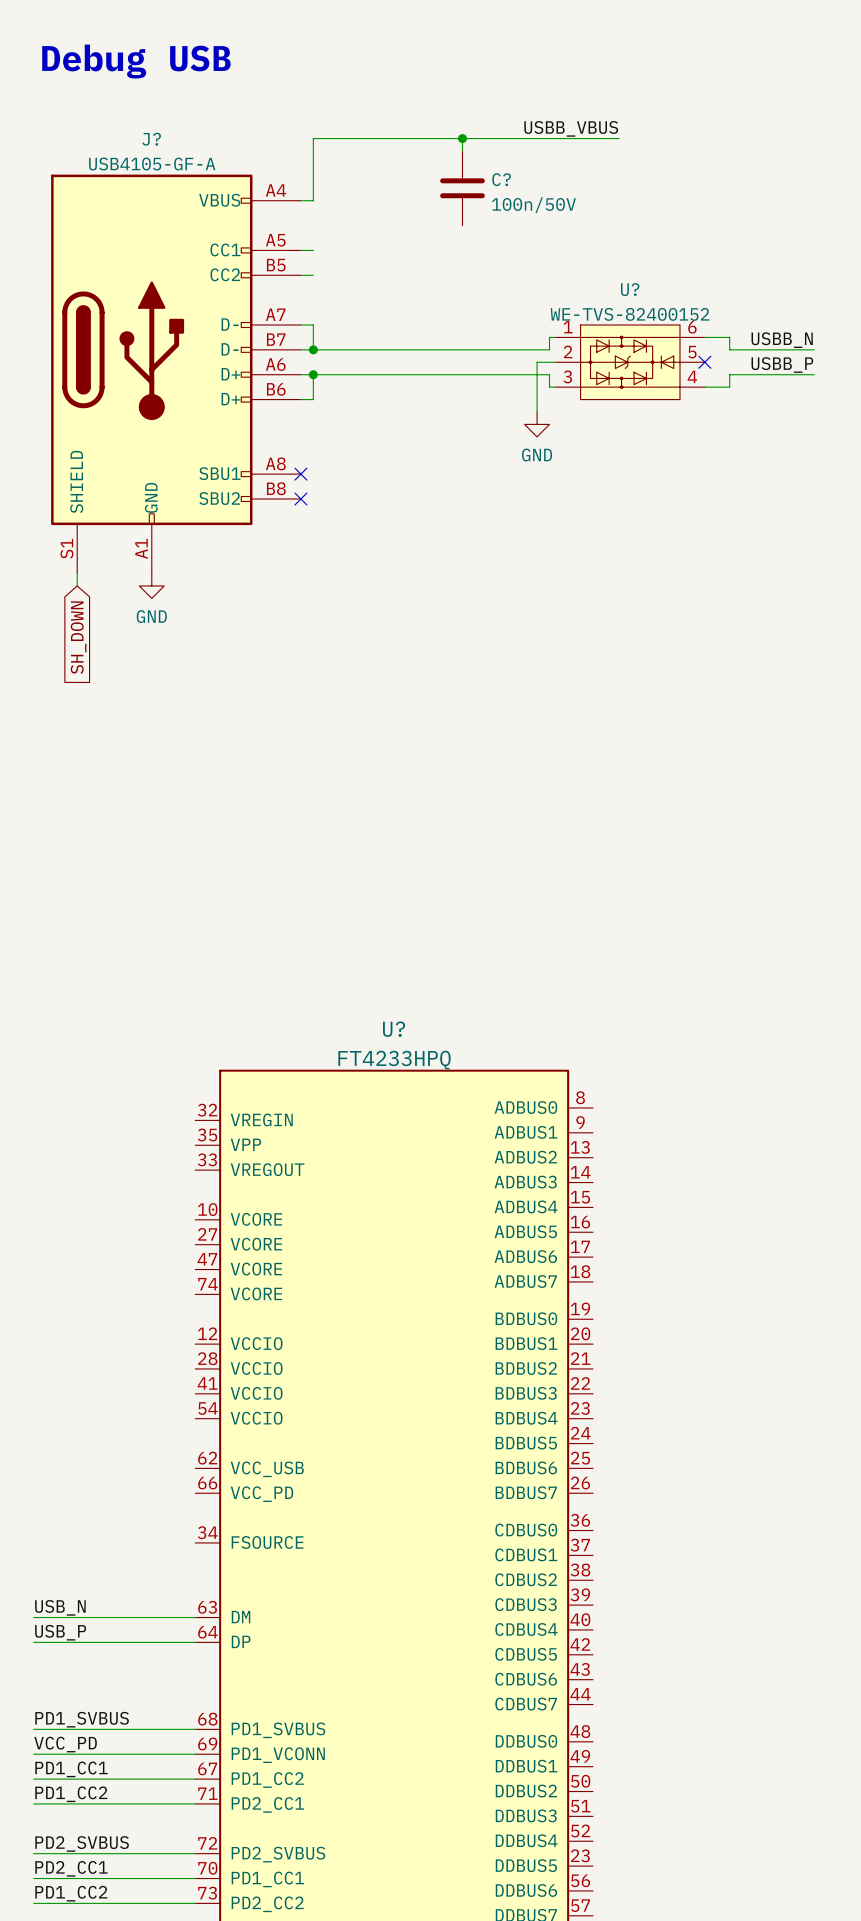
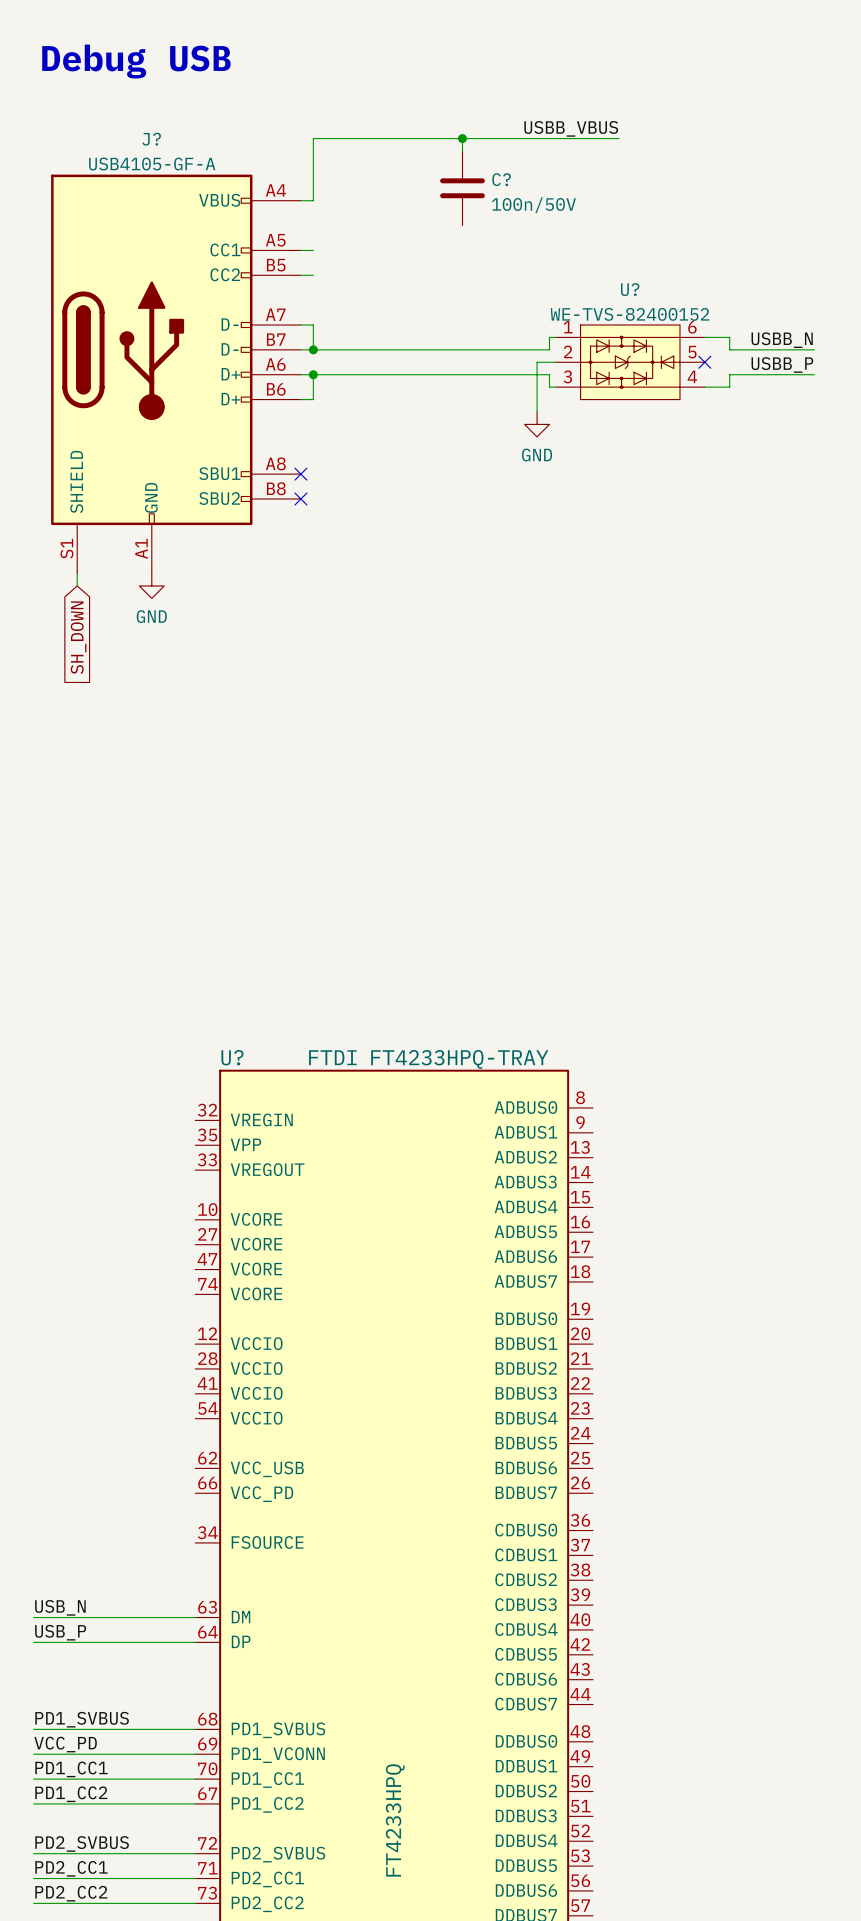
U? name position: U? (394, 1029) -> U? (232, 1057)
U? text: none -> FTDI (332, 1057)
U? text: none -> FT4233HPQ-TRAY (459, 1059)
U? value rotation: 0° (394, 1060) -> 90° counterclockwise (395, 1820)
U? value position: FT4233HPQ (394, 1060) -> FT4233HPQ (395, 1820)
U? pin number: 67 (207, 1768) -> 70 (207, 1768)
U? pin name: PD1_CC2 (267, 1780) -> PD1_CC1 (267, 1780)
U? pin number: 71 (207, 1793) -> 67 (207, 1793)
U? pin name: PD2_CC1 (267, 1804) -> PD1_CC2 (267, 1804)
U? pin number: 23 (580, 1855) -> 53 (580, 1855)
U? pin number: 70 (207, 1868) -> 71 (207, 1868)
U? pin name: PD1_CC1 (267, 1879) -> PD2_CC1 (267, 1879)
label: PD1_CC2 (71, 1893) -> PD2_CC2 (71, 1893)

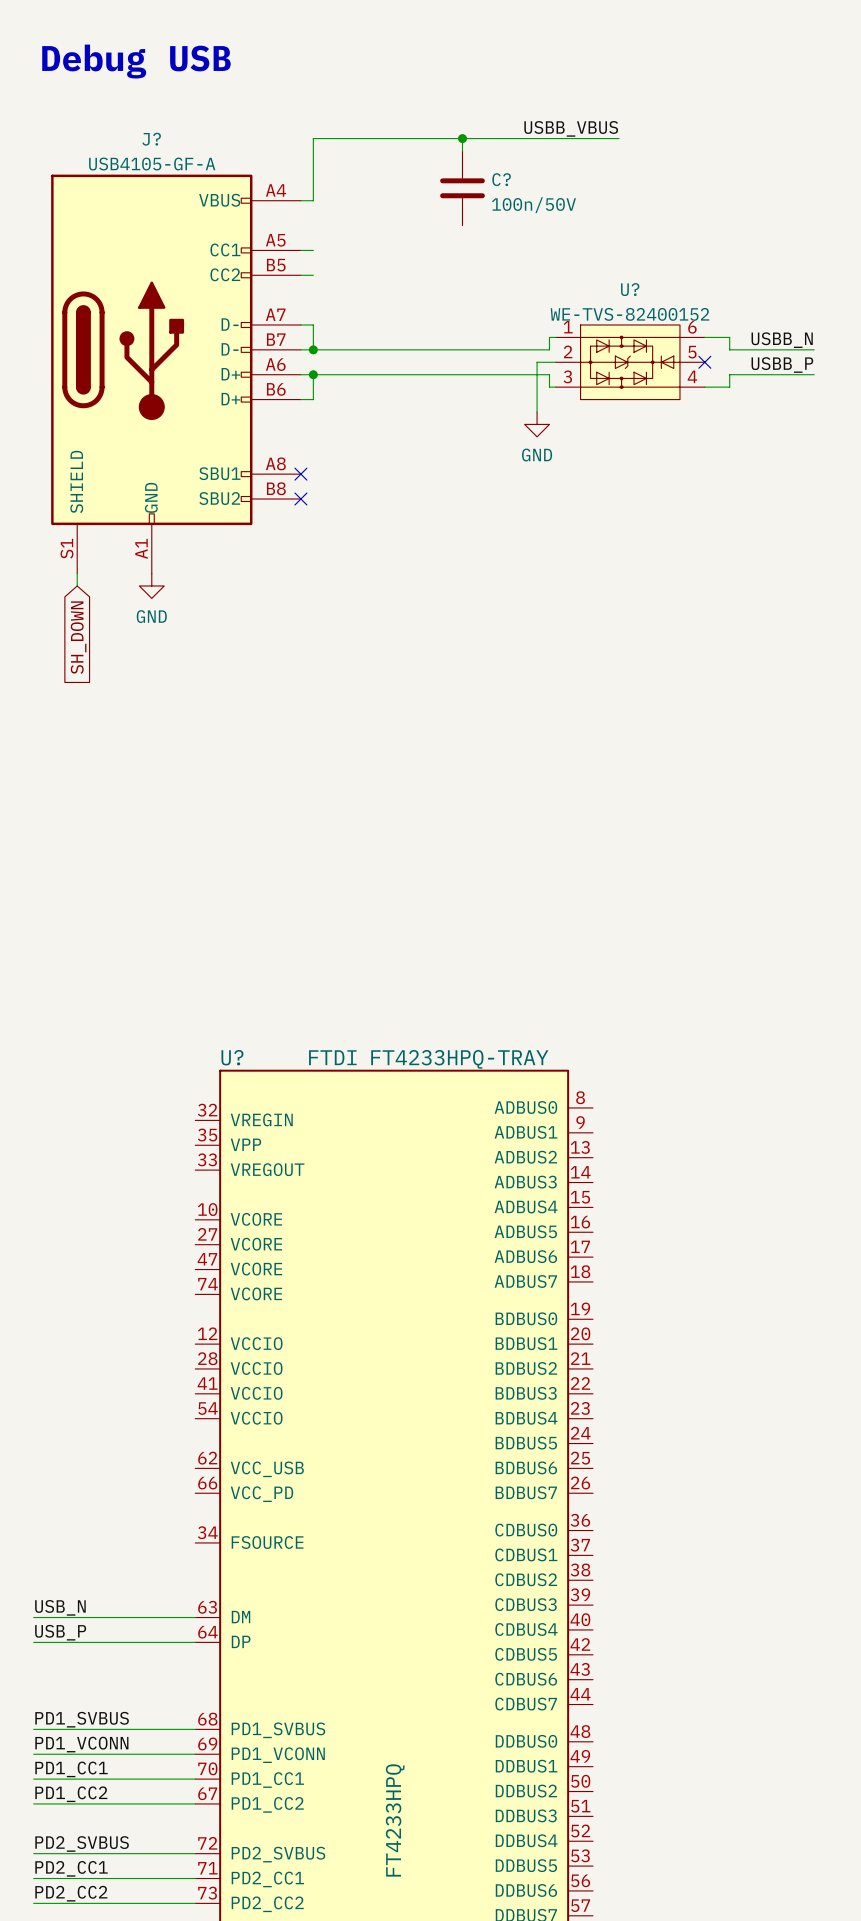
label: VCC_PD (65, 1744) -> PD1_VCONN (81, 1744)

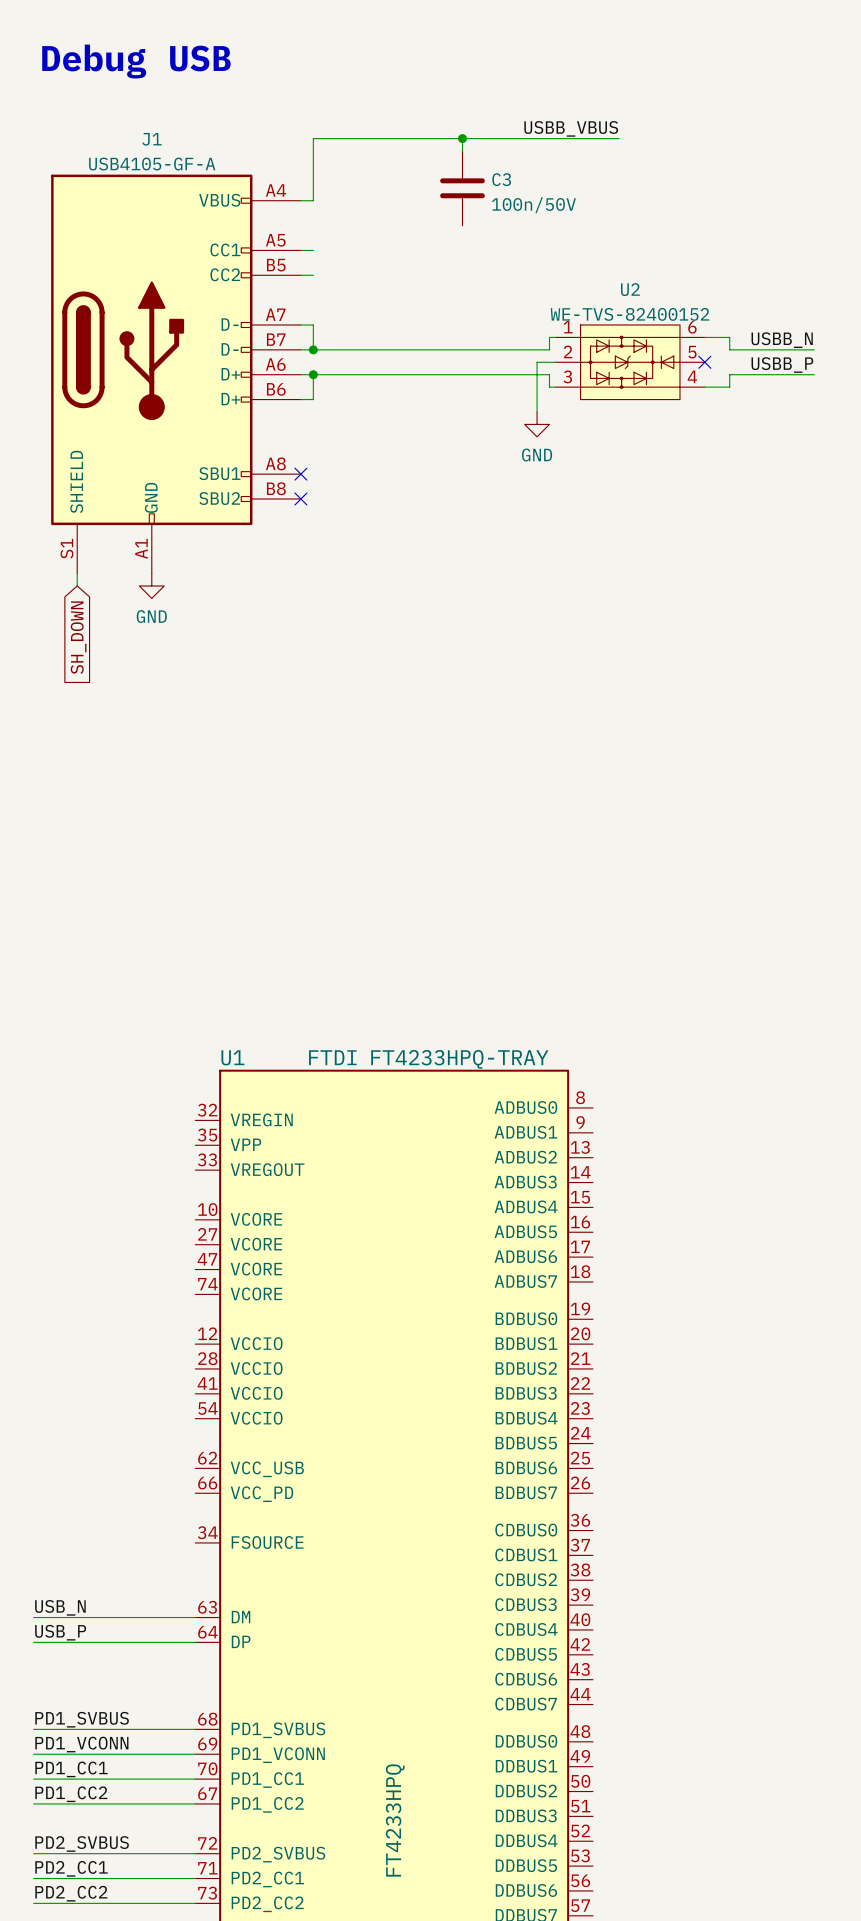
J? name: J? (151, 139) -> J1 (152, 139)
C? name: C? (501, 179) -> C3 (501, 179)
U? name: U? (630, 289) -> U2 (630, 289)
U? name: U? (232, 1057) -> U1 (232, 1057)

